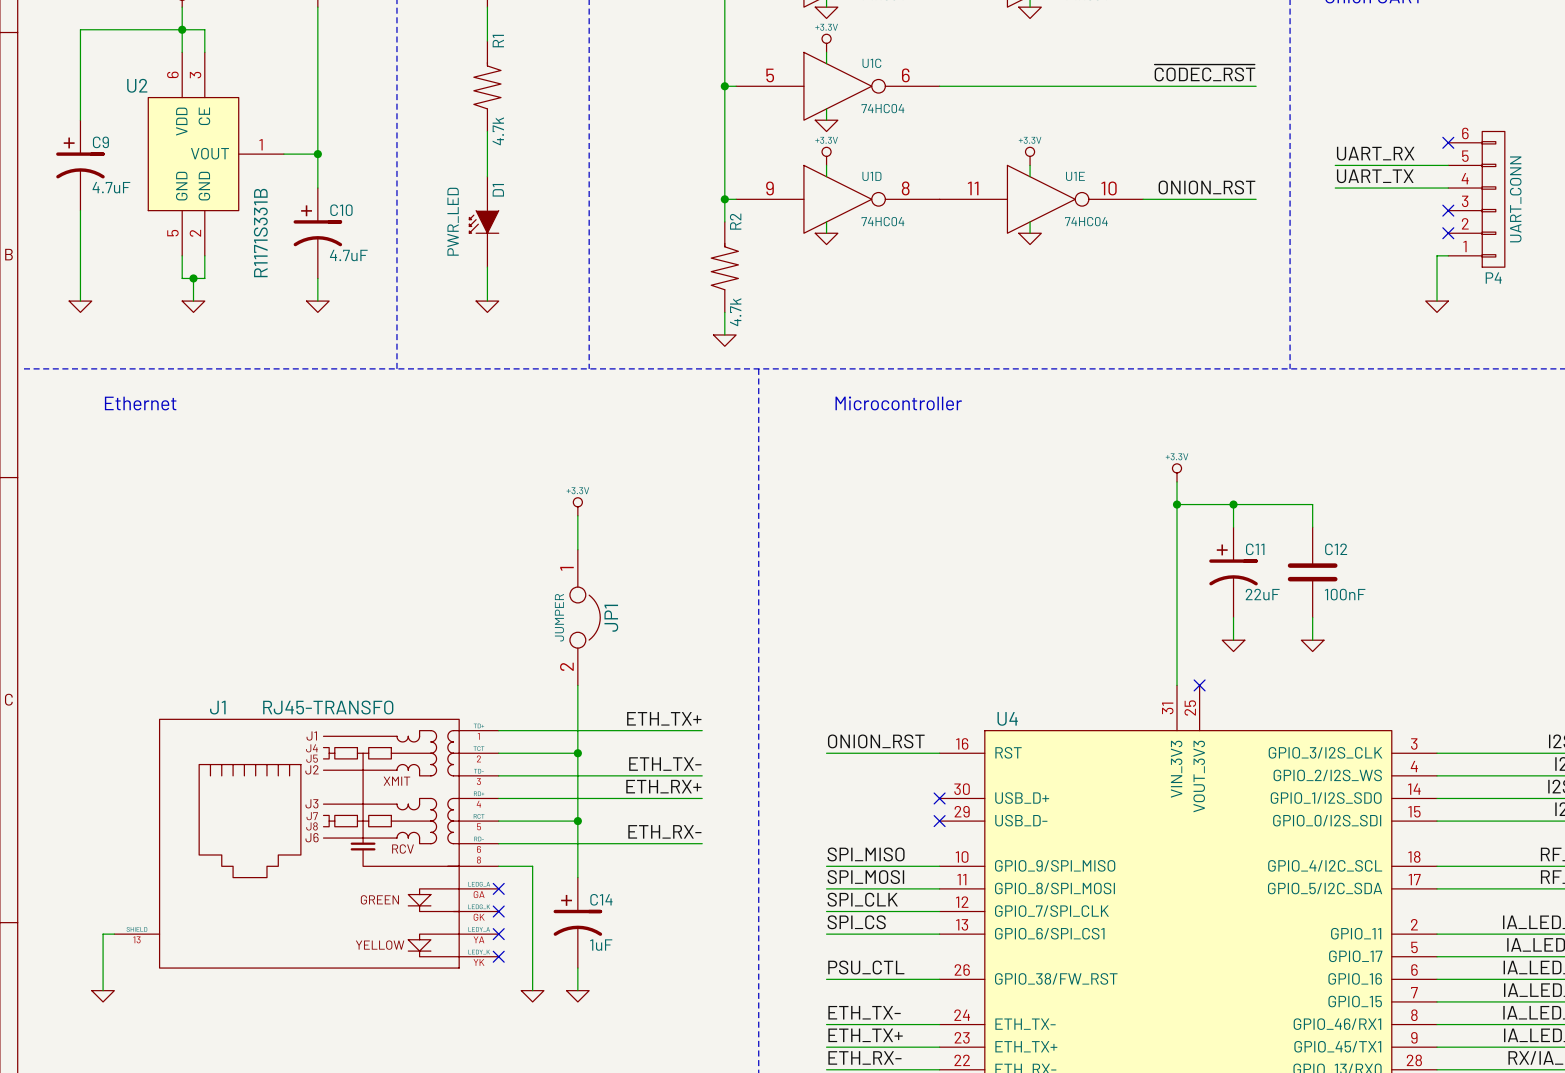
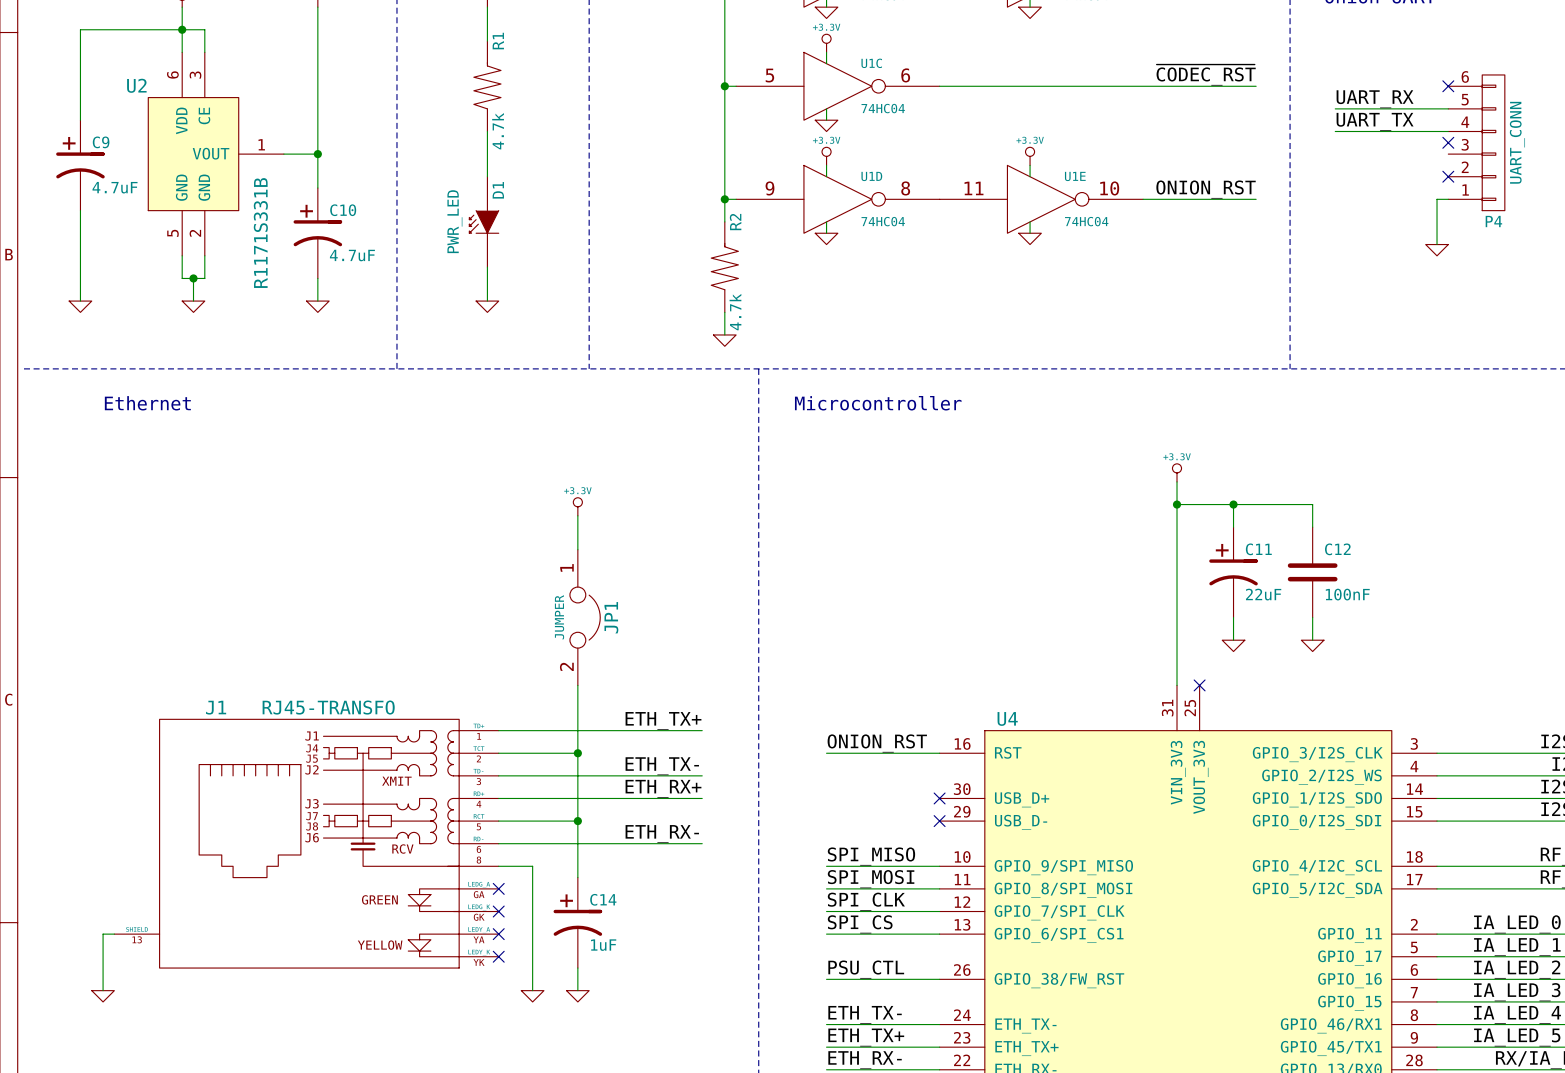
no-connect mark: none -> (1448, 86)
label position: UART_RX (1375, 153) -> UART_RX (1375, 99)
wire: (1335, 165) (1448, 165) -> (1335, 108) (1448, 108)
label position: UART_TX (1375, 176) -> UART_TX (1375, 121)
no-connect mark: none -> (1448, 176)
wire: (1335, 188) (1448, 188) -> (1335, 131) (1448, 131)
P4 position: (1476, 199) -> (1476, 142)
no-connect mark: (1448, 210) -> none
no-connect mark: (1448, 233) -> none
wire: (1448, 255) (1437, 255) (1437, 301) -> (1448, 199) (1437, 199) (1437, 244)
power symbol position: (1437, 306) -> (1437, 250)

